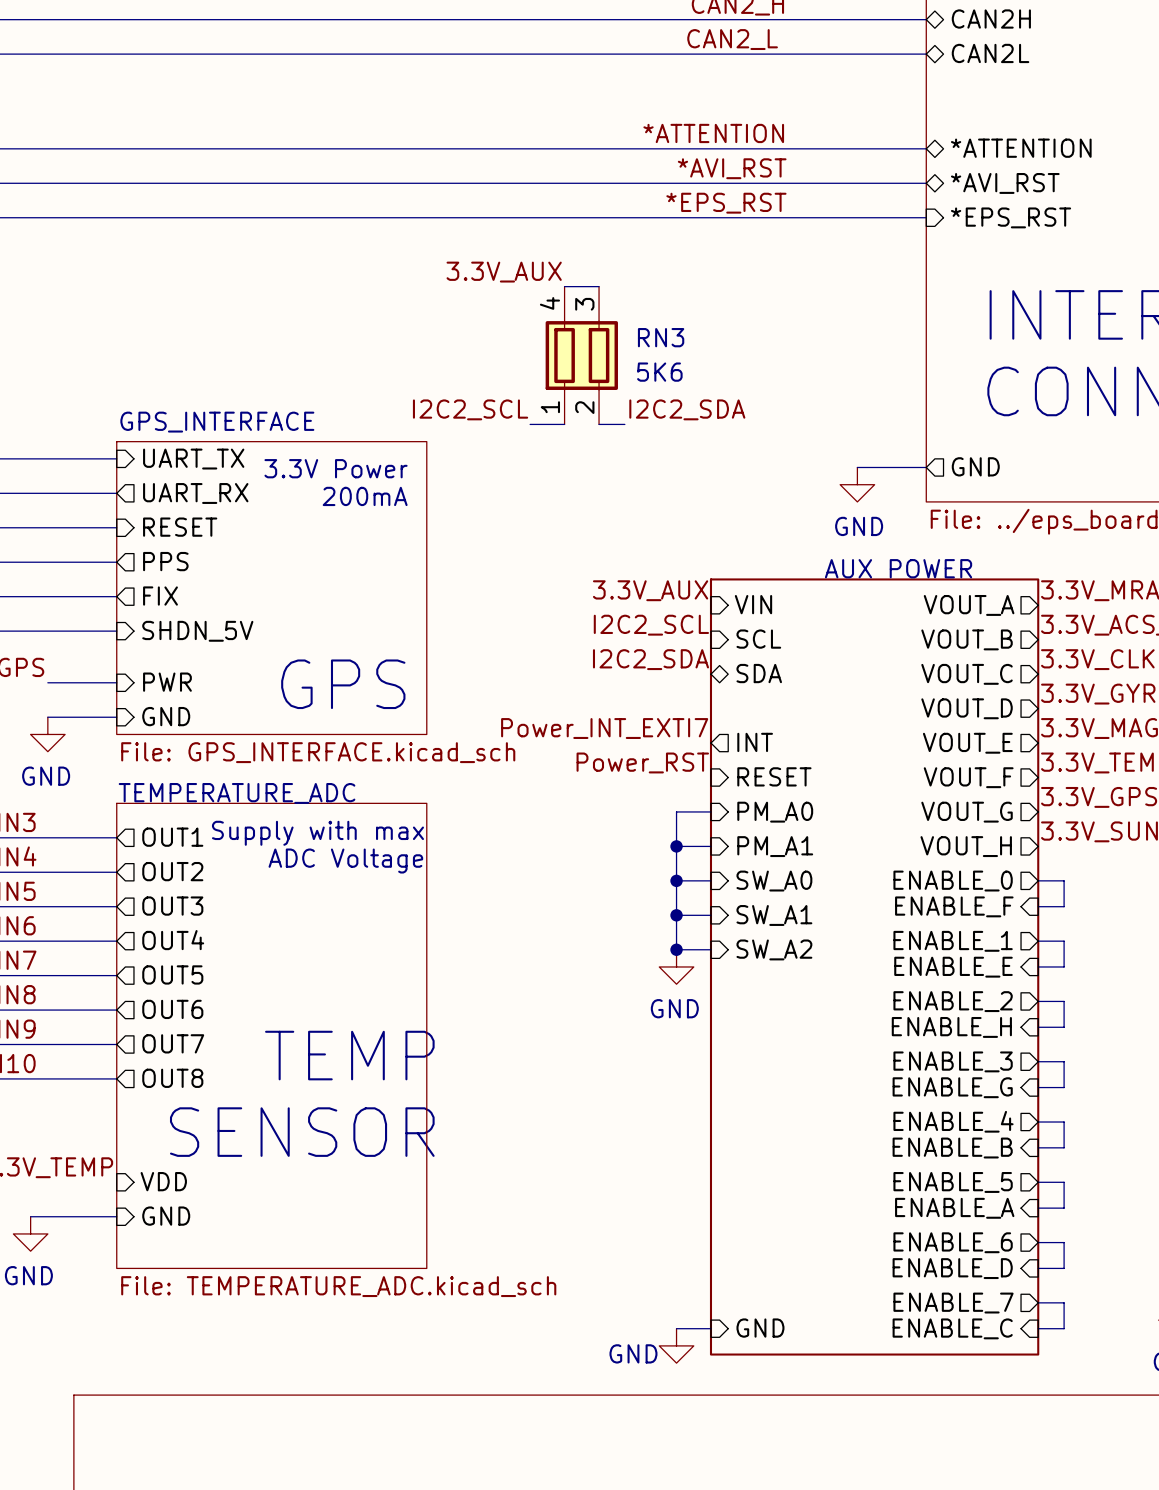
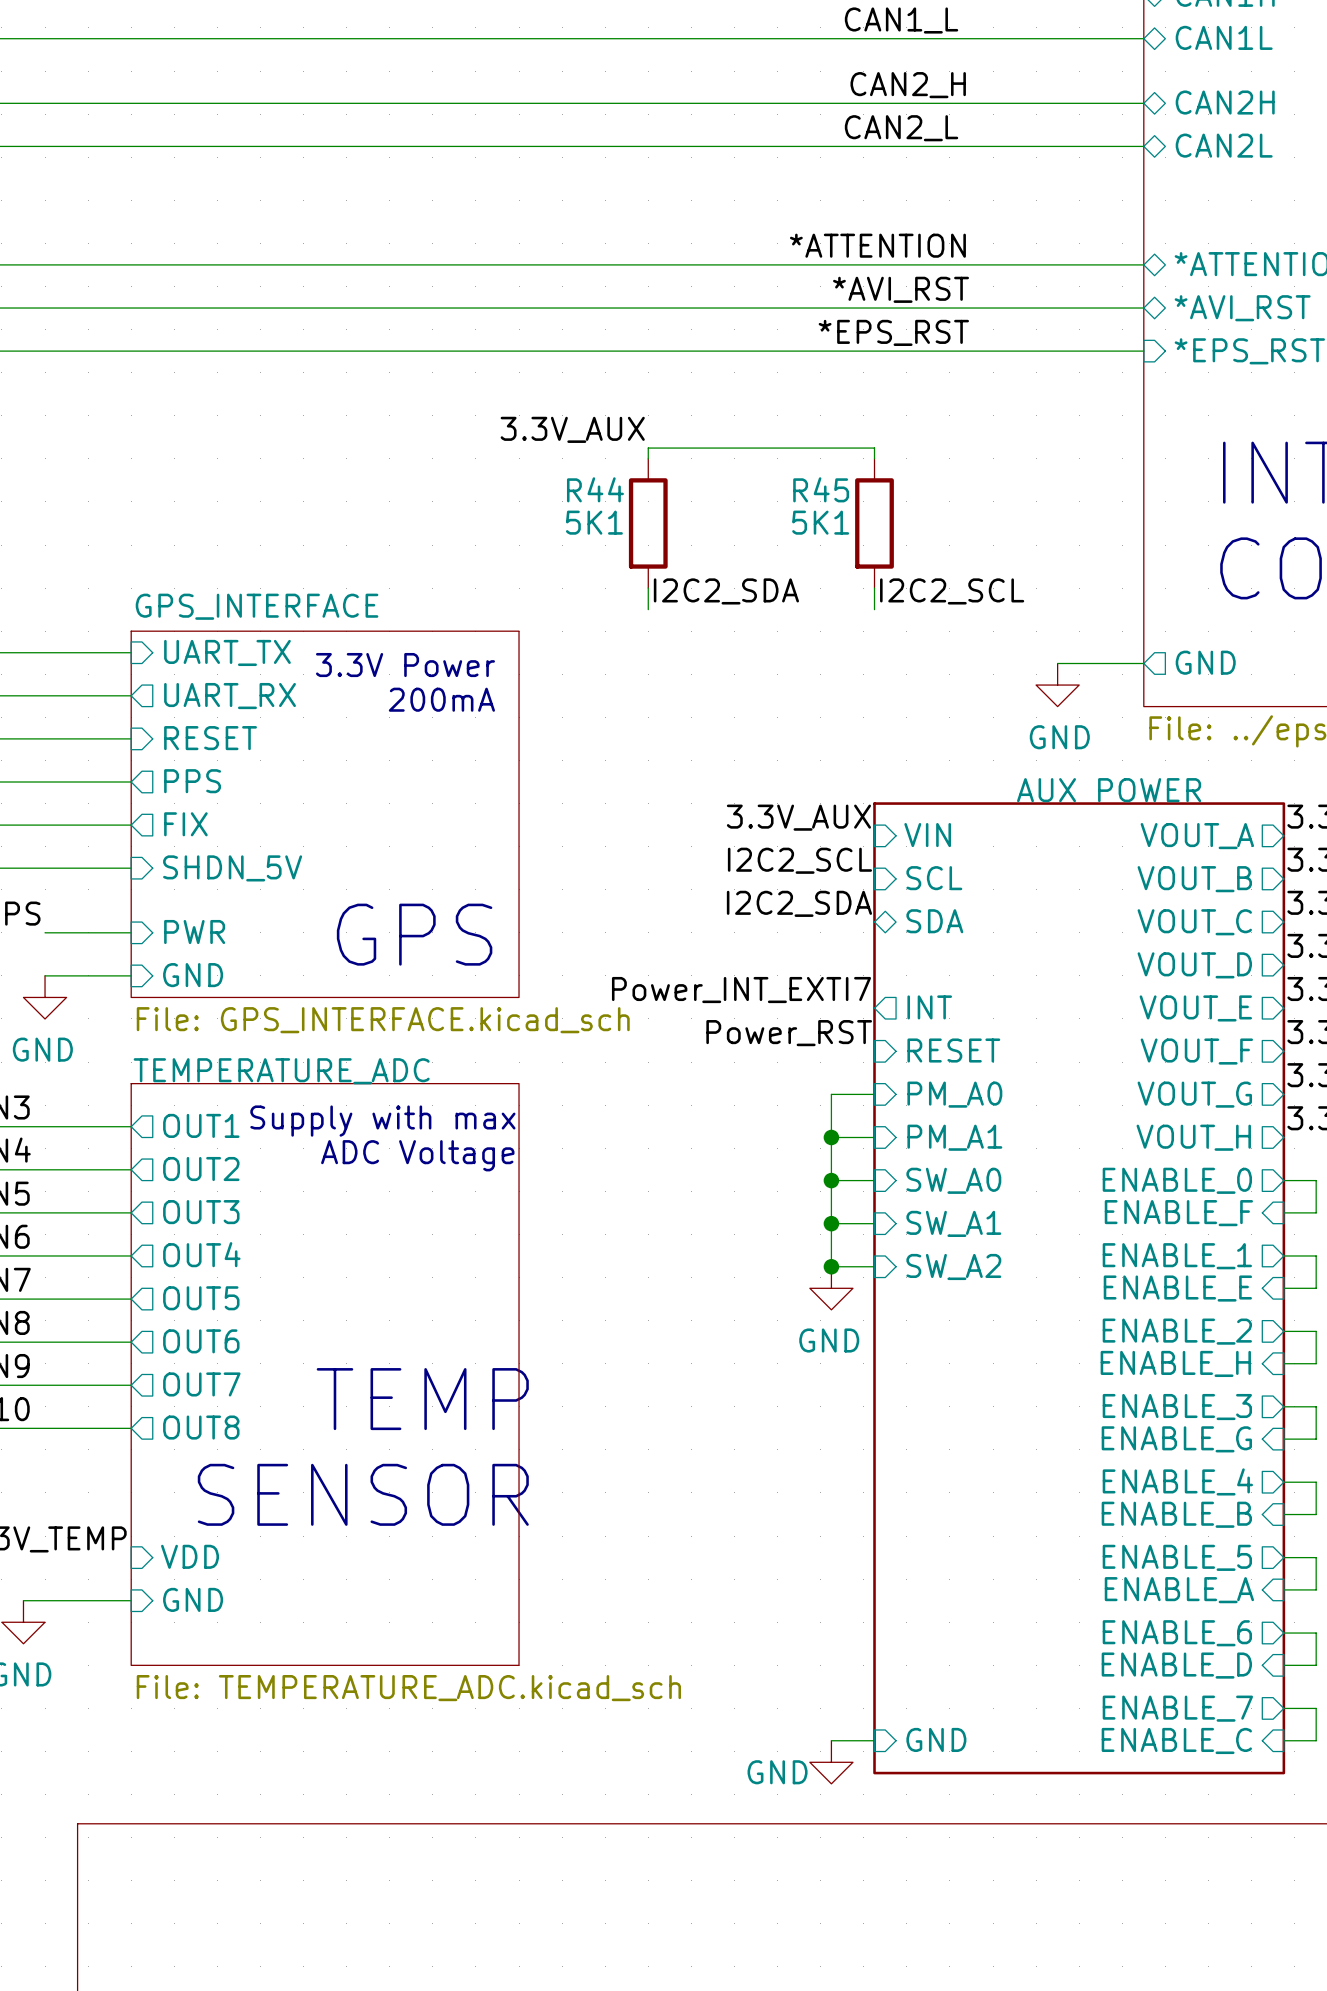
label position: 3.3V_AUX (504, 272) -> 3.3V_AUX (572, 429)
wire: (564, 286) (599, 286) -> none
wire: none -> (648, 458) (648, 448) (874, 448) (874, 458)
R44: none -> 5K1 (648, 523)
RN3: 5K6 (581, 355) -> none
R45: none -> 5K1 (874, 523)
wire: none -> (874, 588) (874, 609)
label: I2C2_SCL (470, 409) -> I2C2_SDA (726, 591)
label: I2C2_SDA (687, 409) -> I2C2_SCL (952, 591)
wire: (530, 424) (564, 424) -> (648, 609) (648, 588)
wire: (599, 424) (624, 424) -> none

